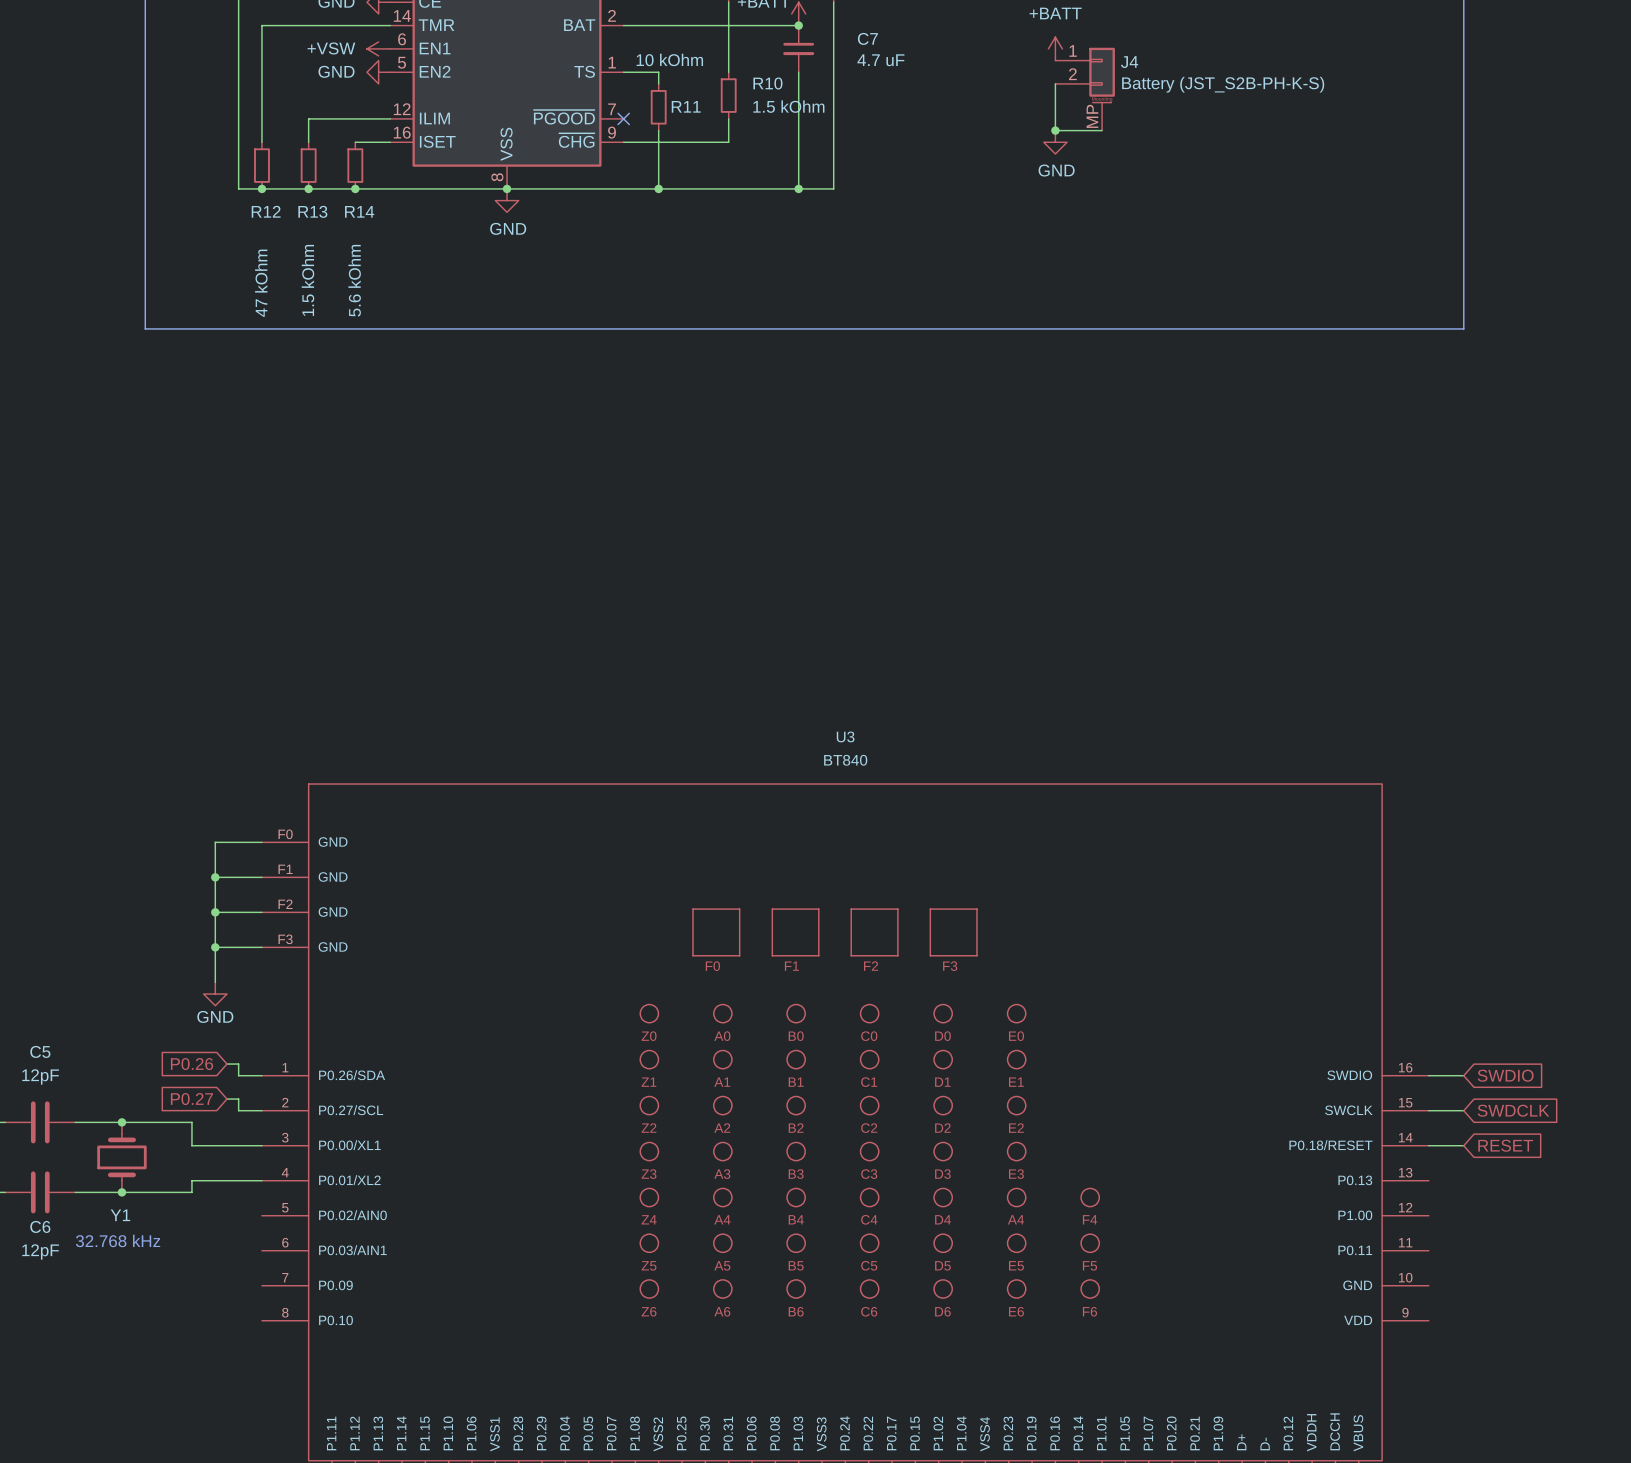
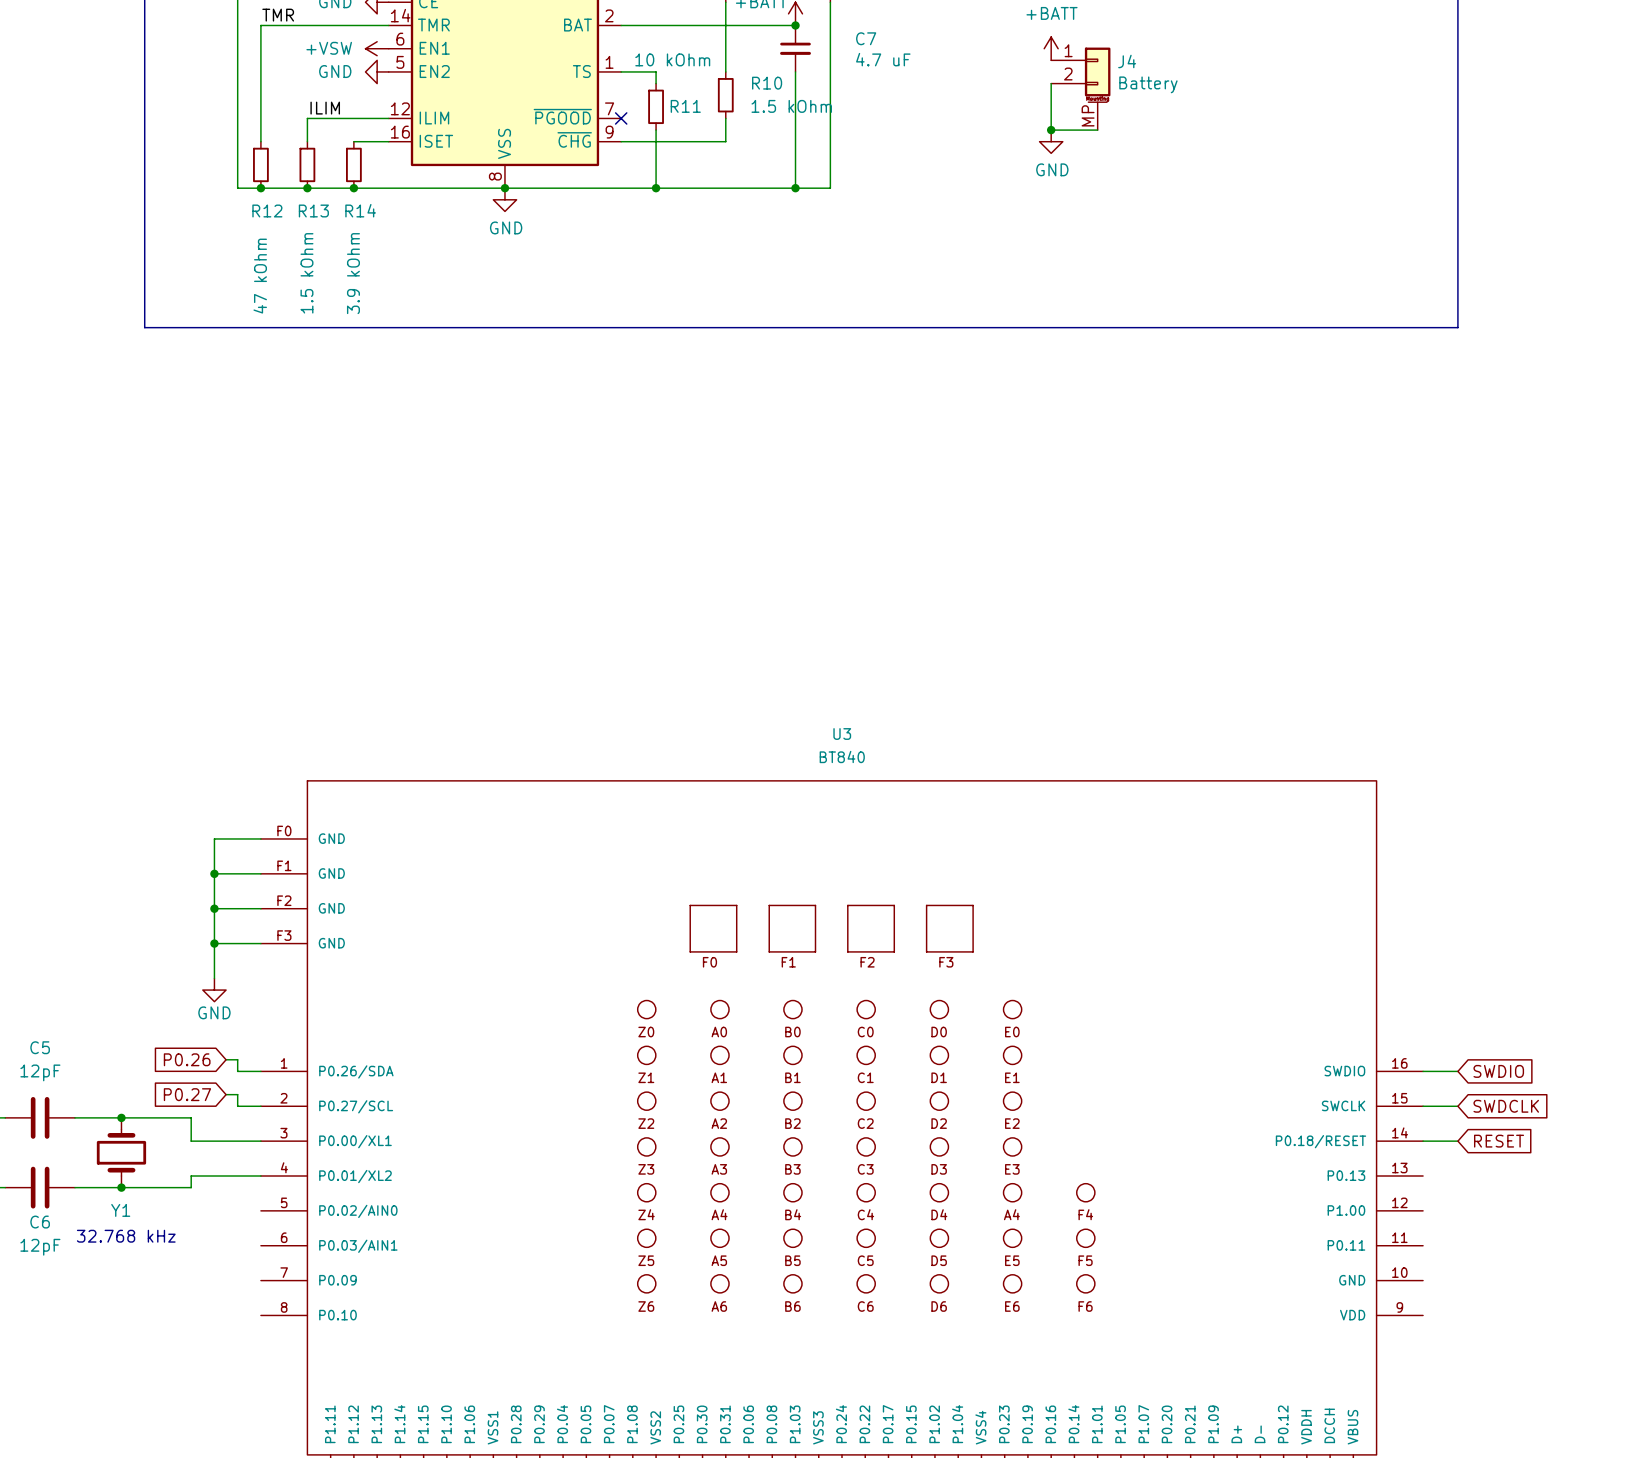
label: none -> TMR (278, 15)
J4 value: Battery (JST_S2B-PH-K-S) (1223, 84) -> Battery (1148, 84)
label: none -> ILIM (325, 108)
R14 value: 5.6 kOhm (354, 280) -> 3.9 kOhm (353, 273)

